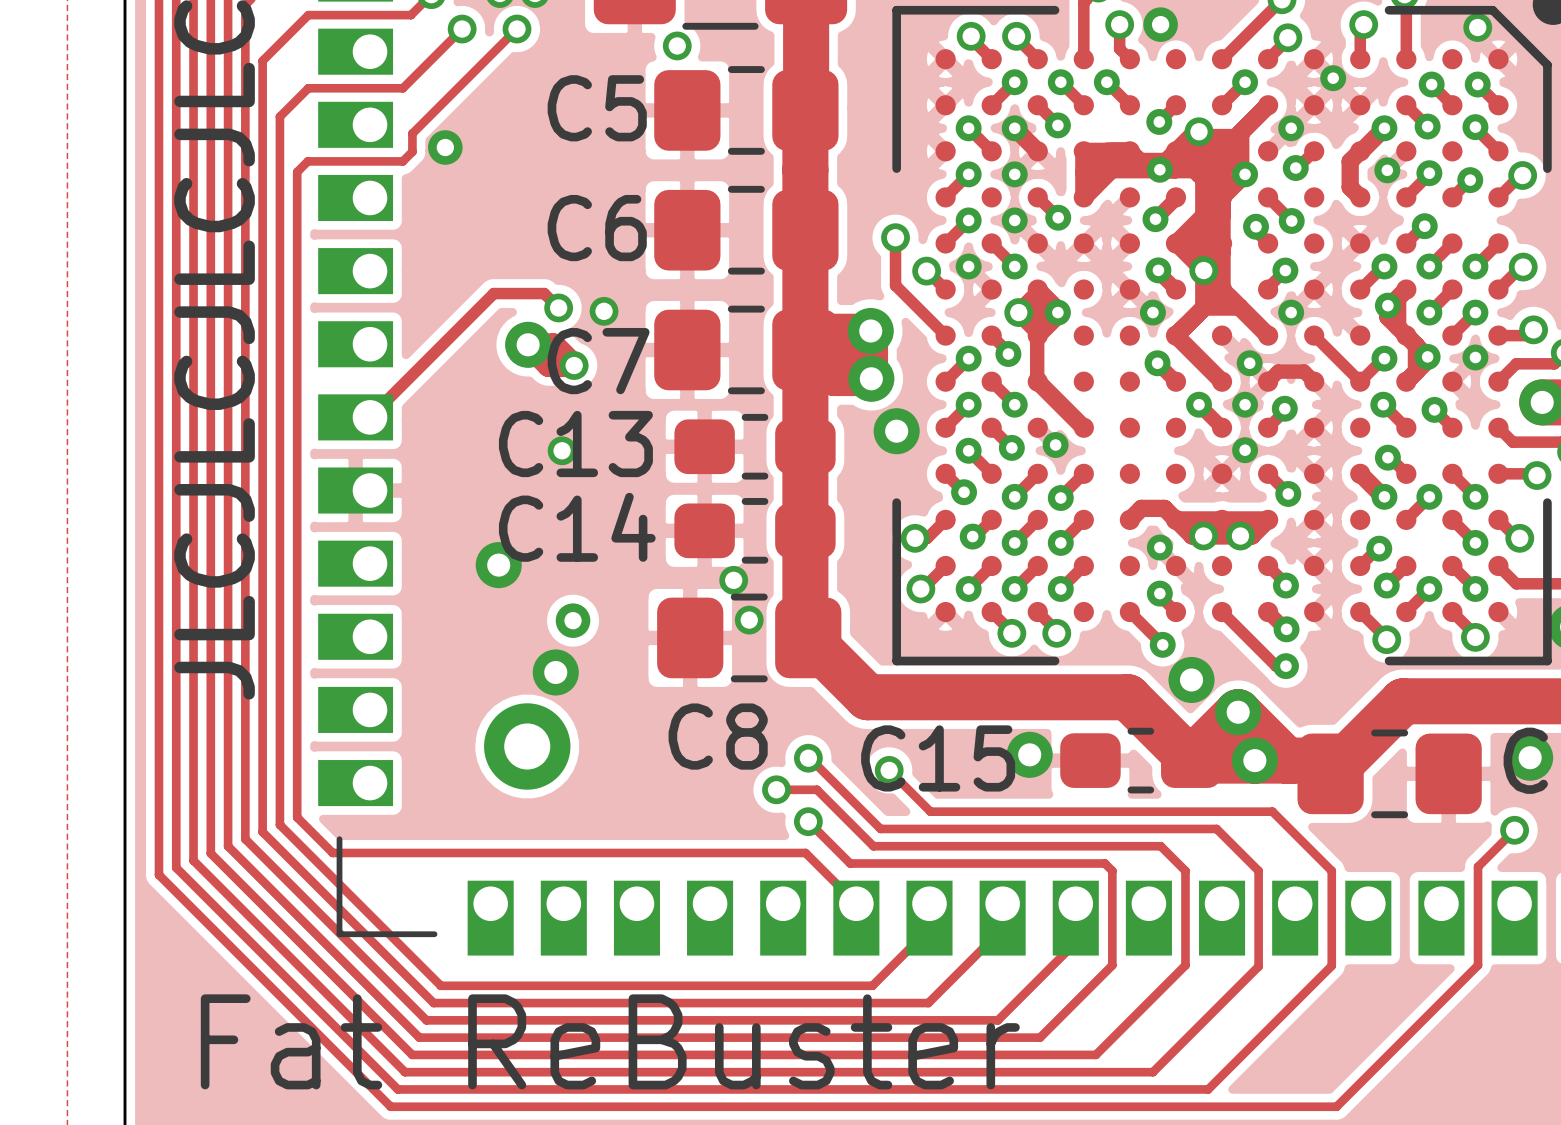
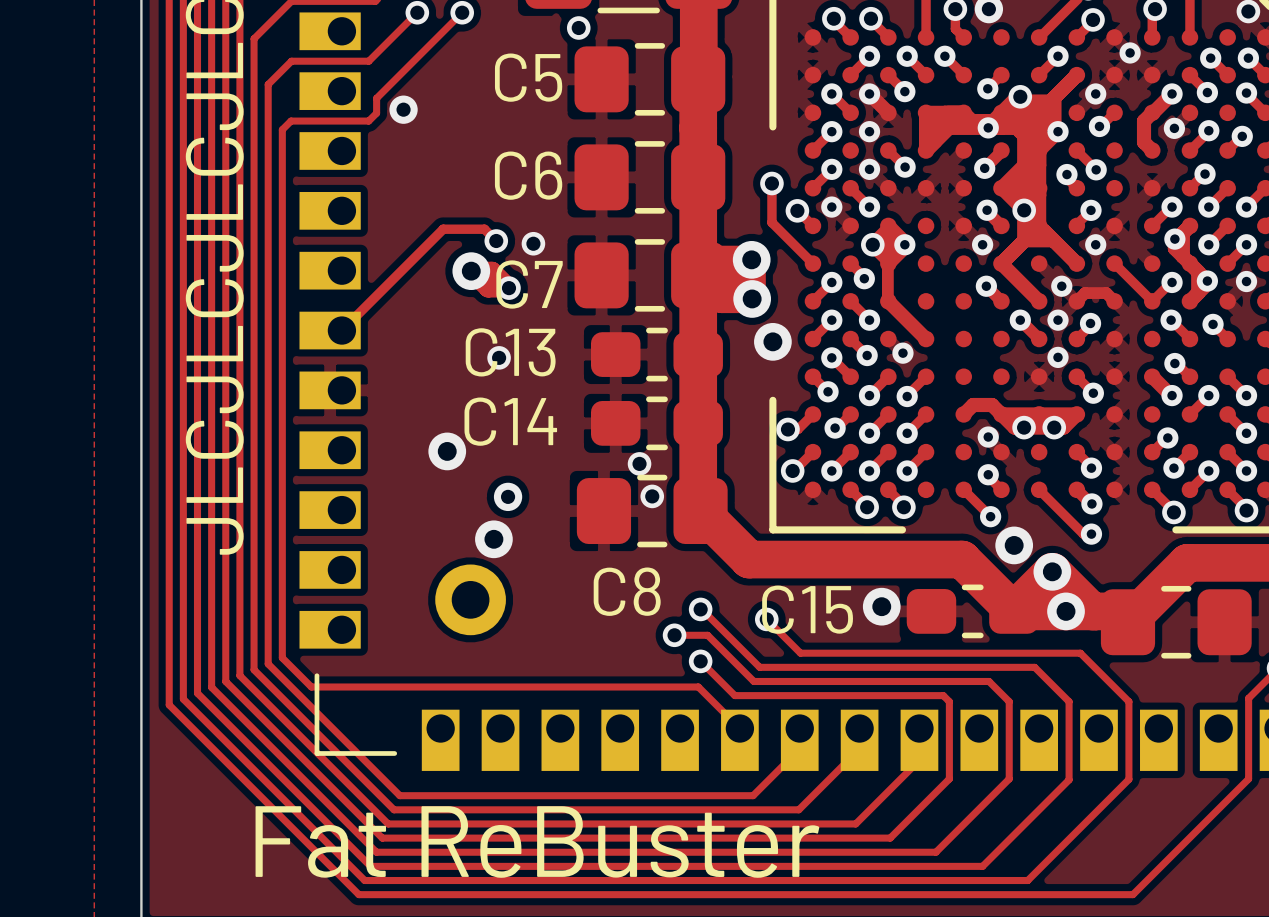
via position: (677, 45) -> (578, 27)

